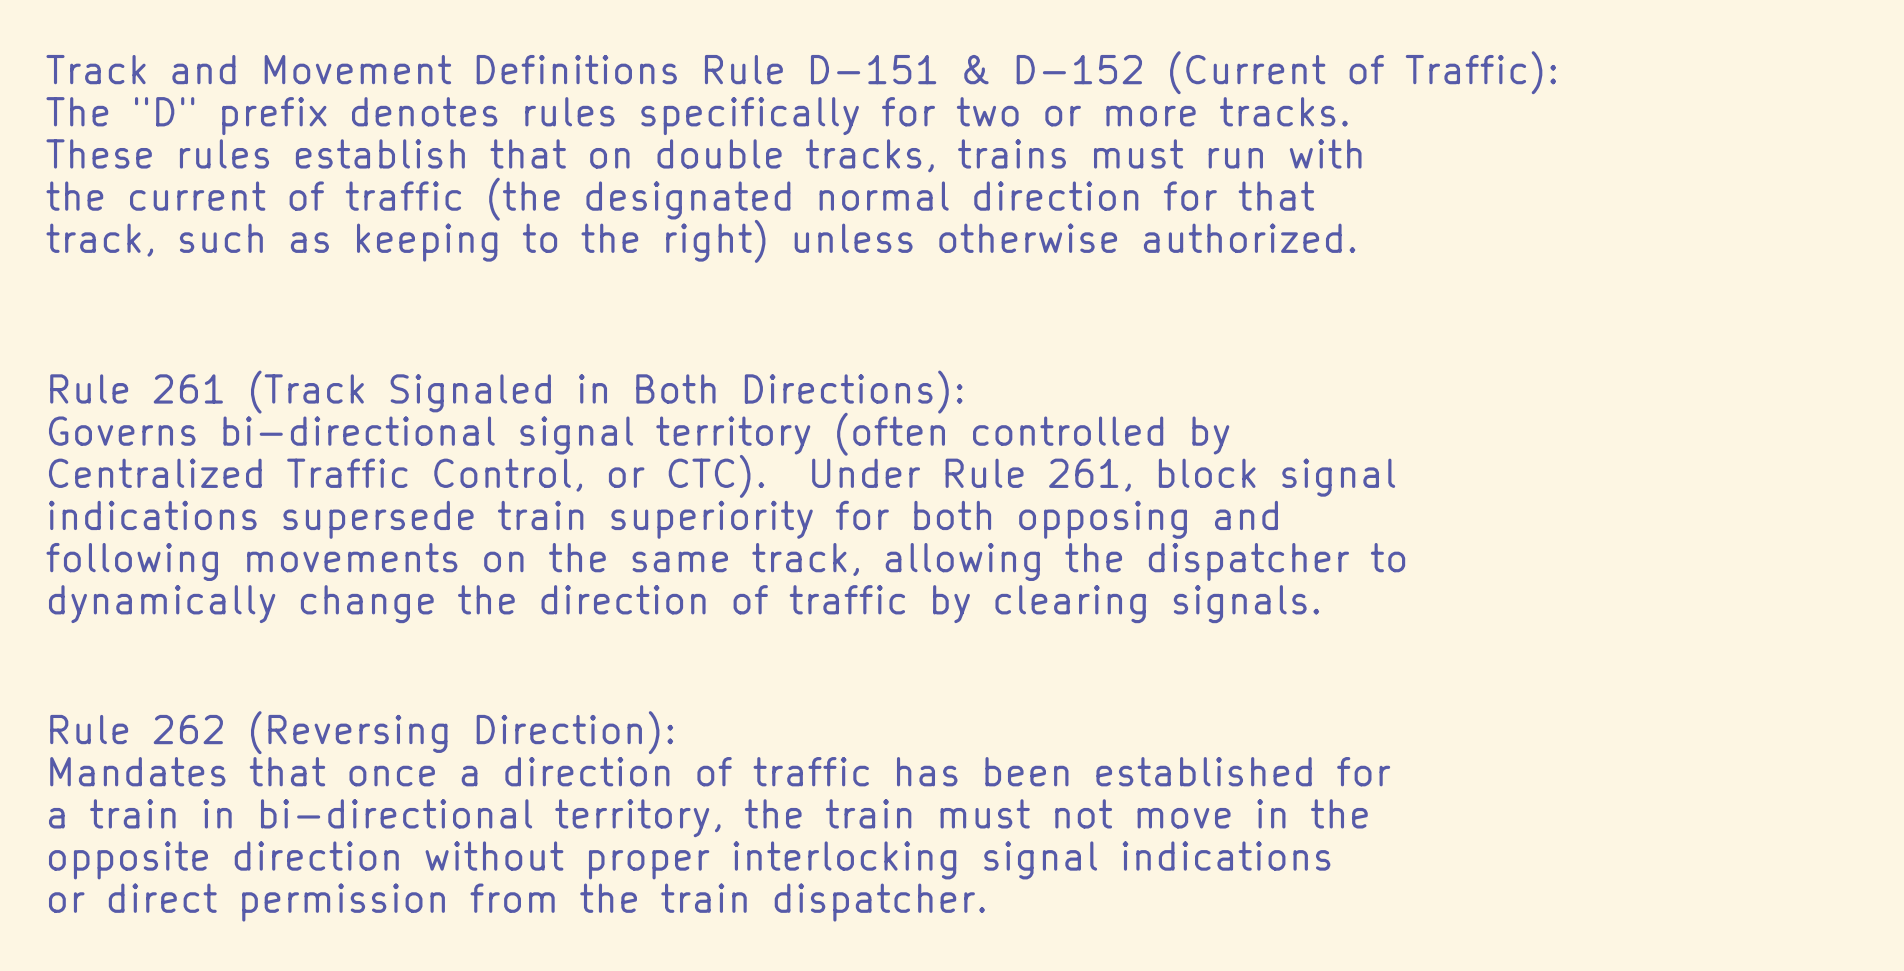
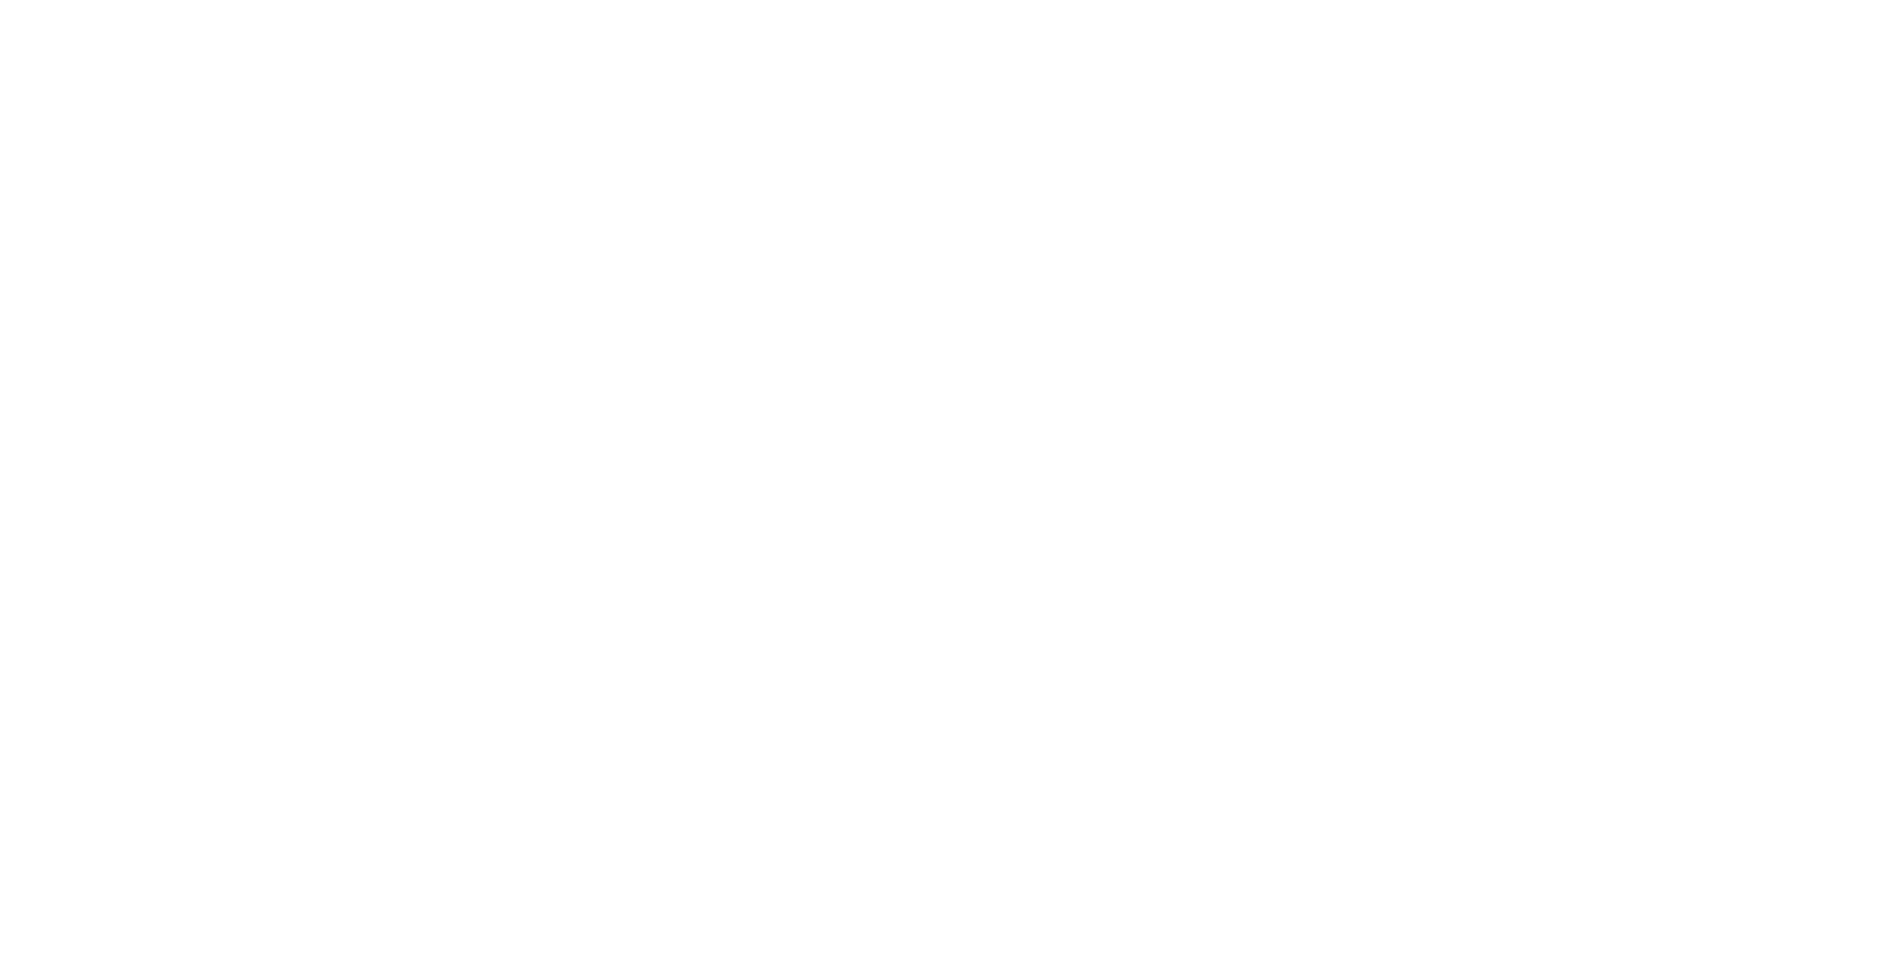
text: Track and Movement Definitions Rule D-151 & D-152 (Current of Traffic): (801, 72) -> none
text: The "D" prefix denotes rules specifically for two or more tracks. (697, 116) -> none
text: These rules establish that on double tracks, trains must run with (703, 155) -> none
text: the current of traffic (the designated normal direction for that (680, 199) -> none
text: track, such as keeping to the right) unless otherwise authorized. (700, 241) -> none
text: Rule 261 (Track Signaled in Both Directions): (506, 392) -> none
text: Governs bi-directional signal territory (often controlled by (639, 434) -> none
text: Centralized Traffic Control, or CTC). Under Rule 261, block signal (722, 476) -> none
text: indications supersede train superiority for both opposing and (663, 519) -> none
text: following movements on the same track, allowing the dispatcher to (725, 561) -> none
text: dynamically change the direction of traffic by clearing signals. (684, 604) -> none
text: Rule 262 (Reversing Direction): (361, 732) -> none
text: Mandates that once a direction of traffic has been established for (720, 771) -> none
text: a train in bi-directional territory, the train must not move in the (708, 818) -> none
text: opposite direction without proper interlocking signal indications (689, 860) -> none
text: or direct permission from the train dispatcher. (516, 902) -> none

